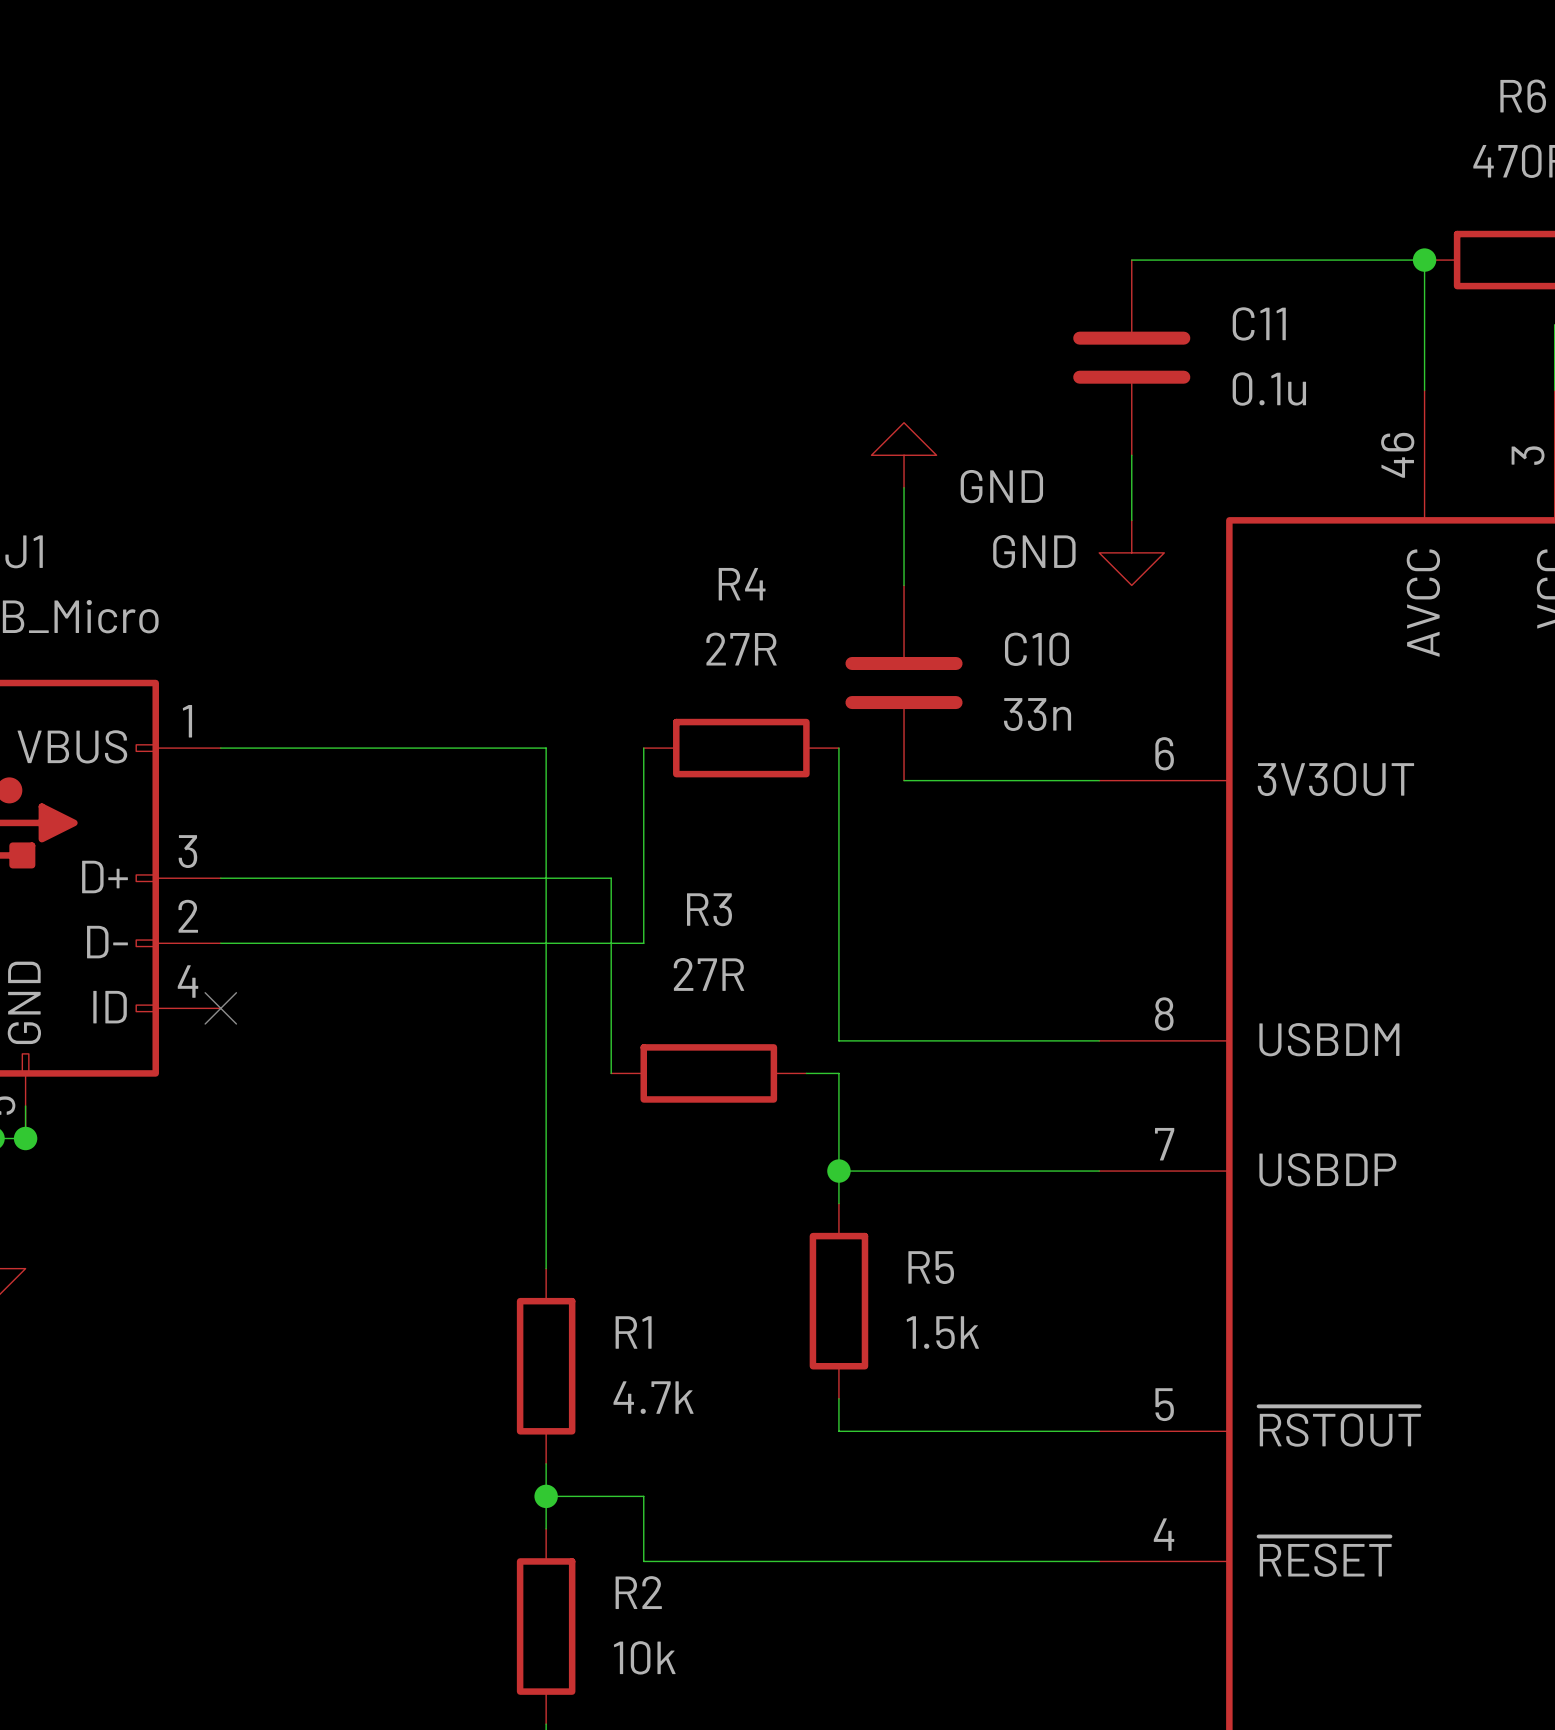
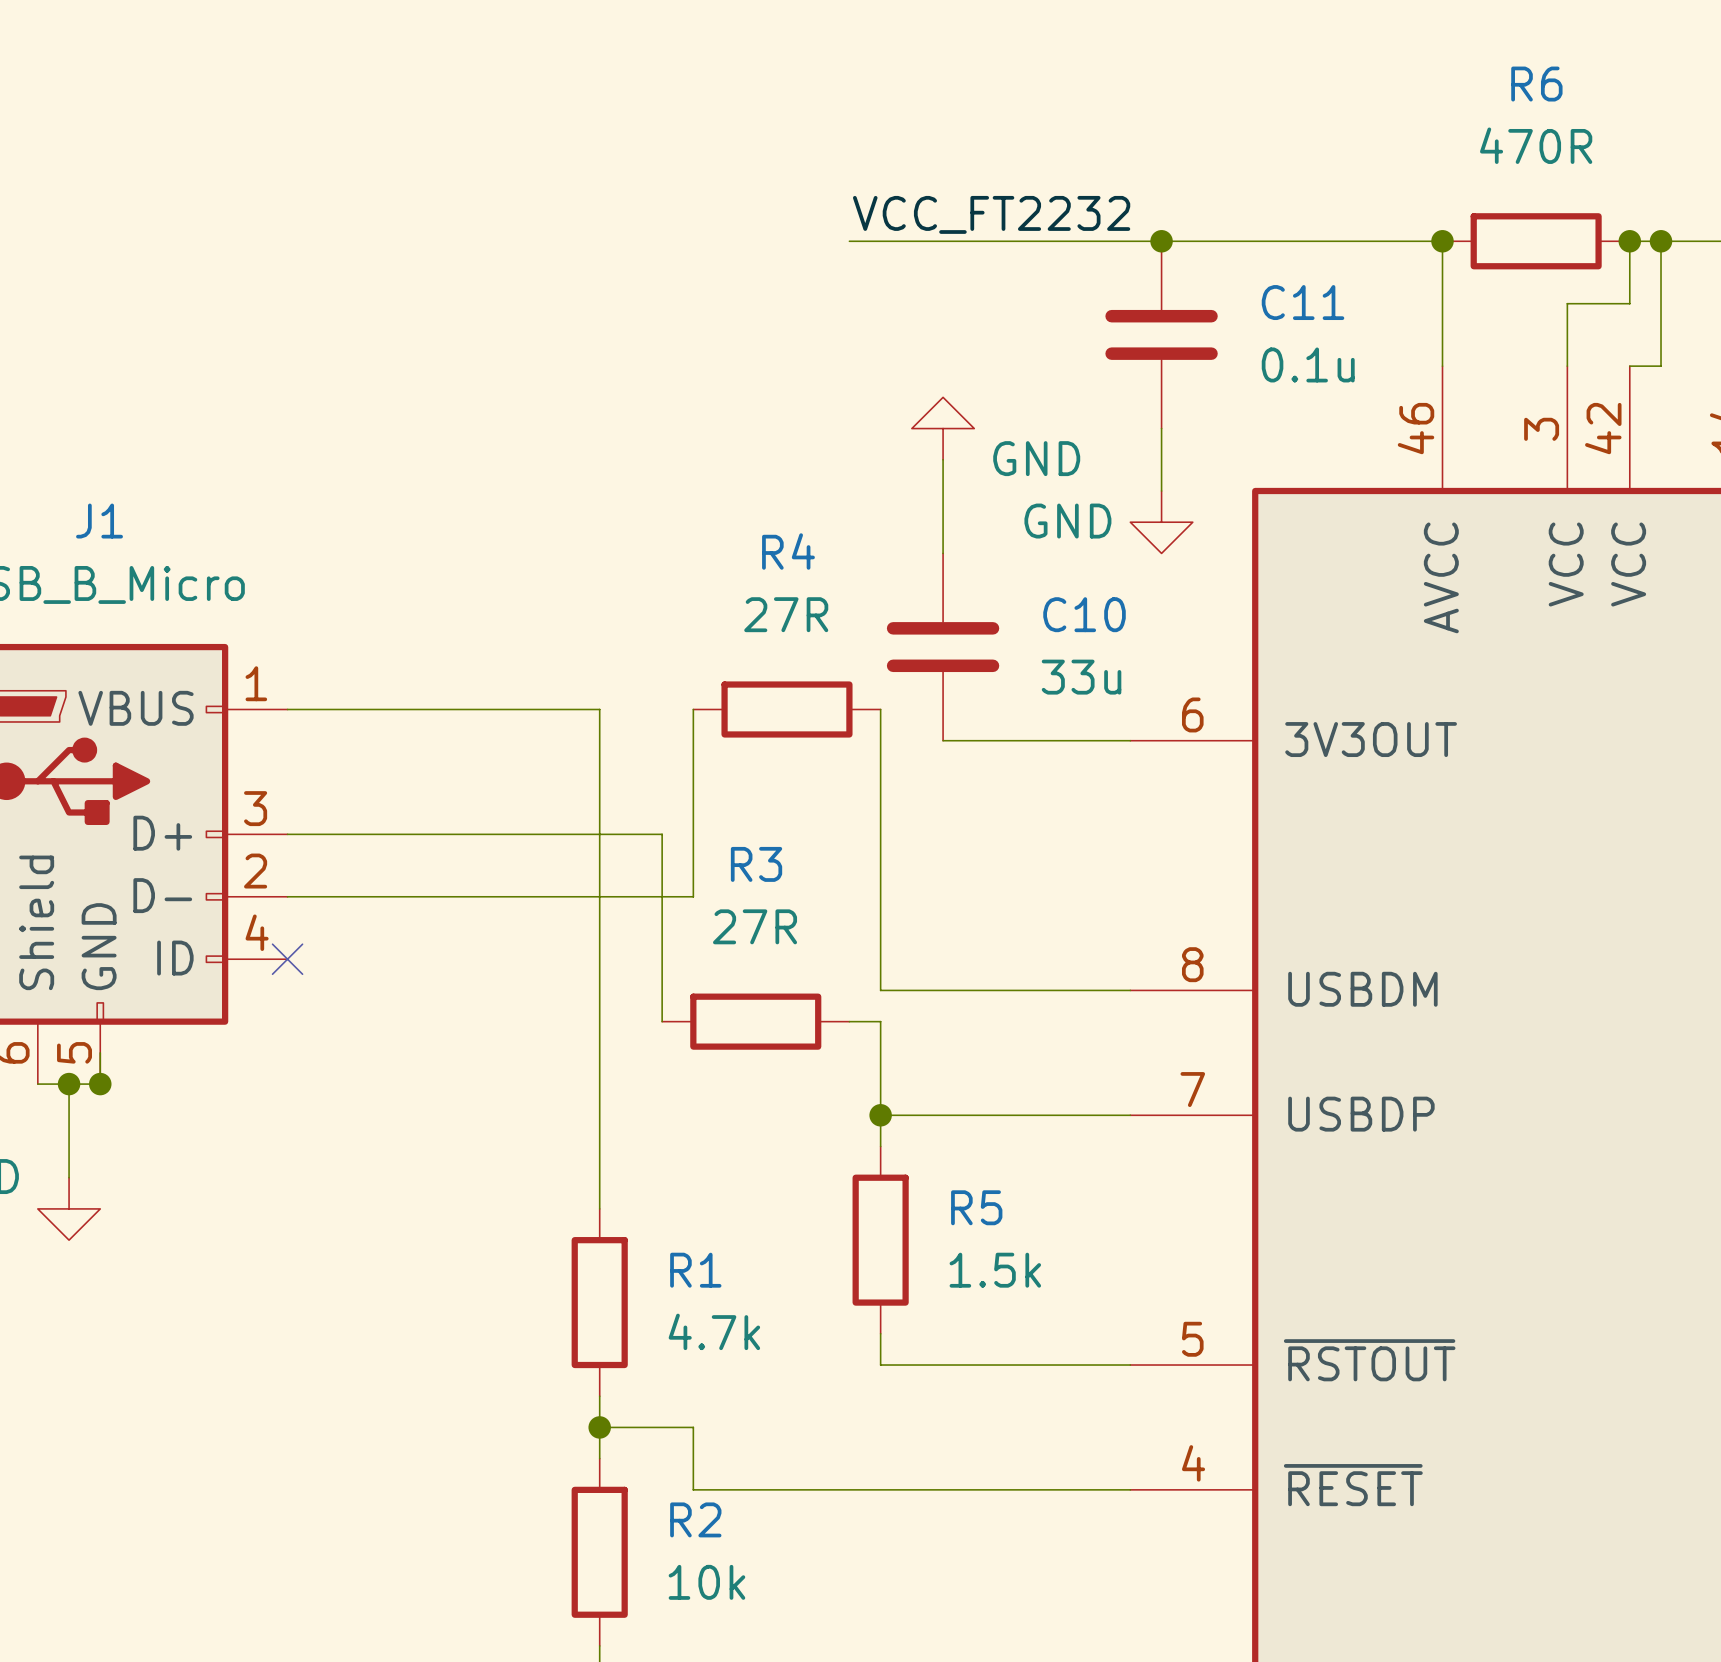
label: none -> VCC_FT2232 (991, 214)
wire: none -> (849, 241) (1161, 241)
junction: none -> (1161, 241)
C10 value: 33n (1037, 714) -> 33u (1081, 677)

